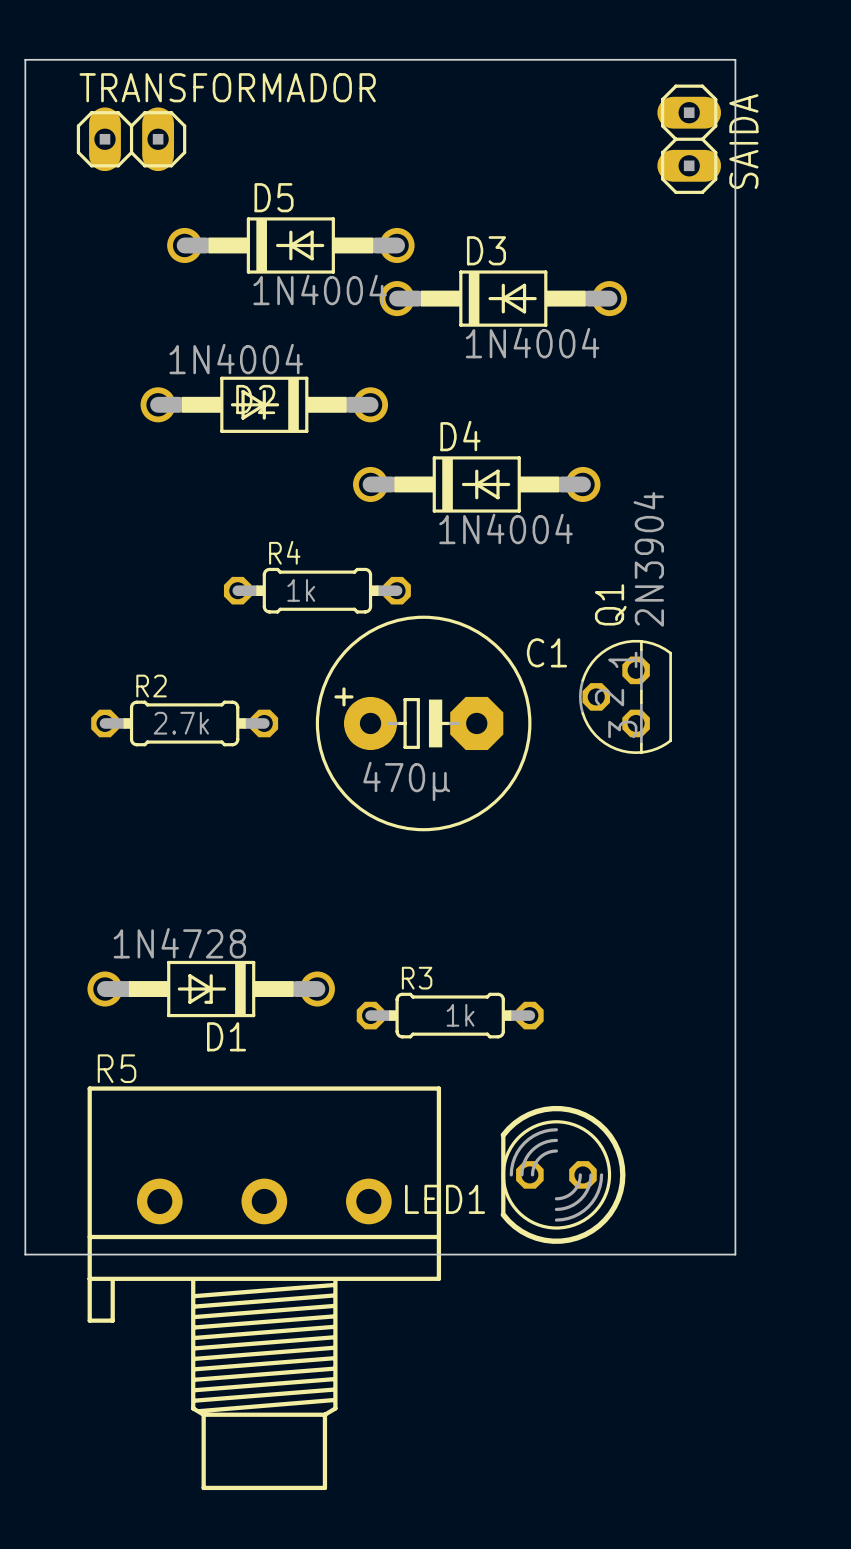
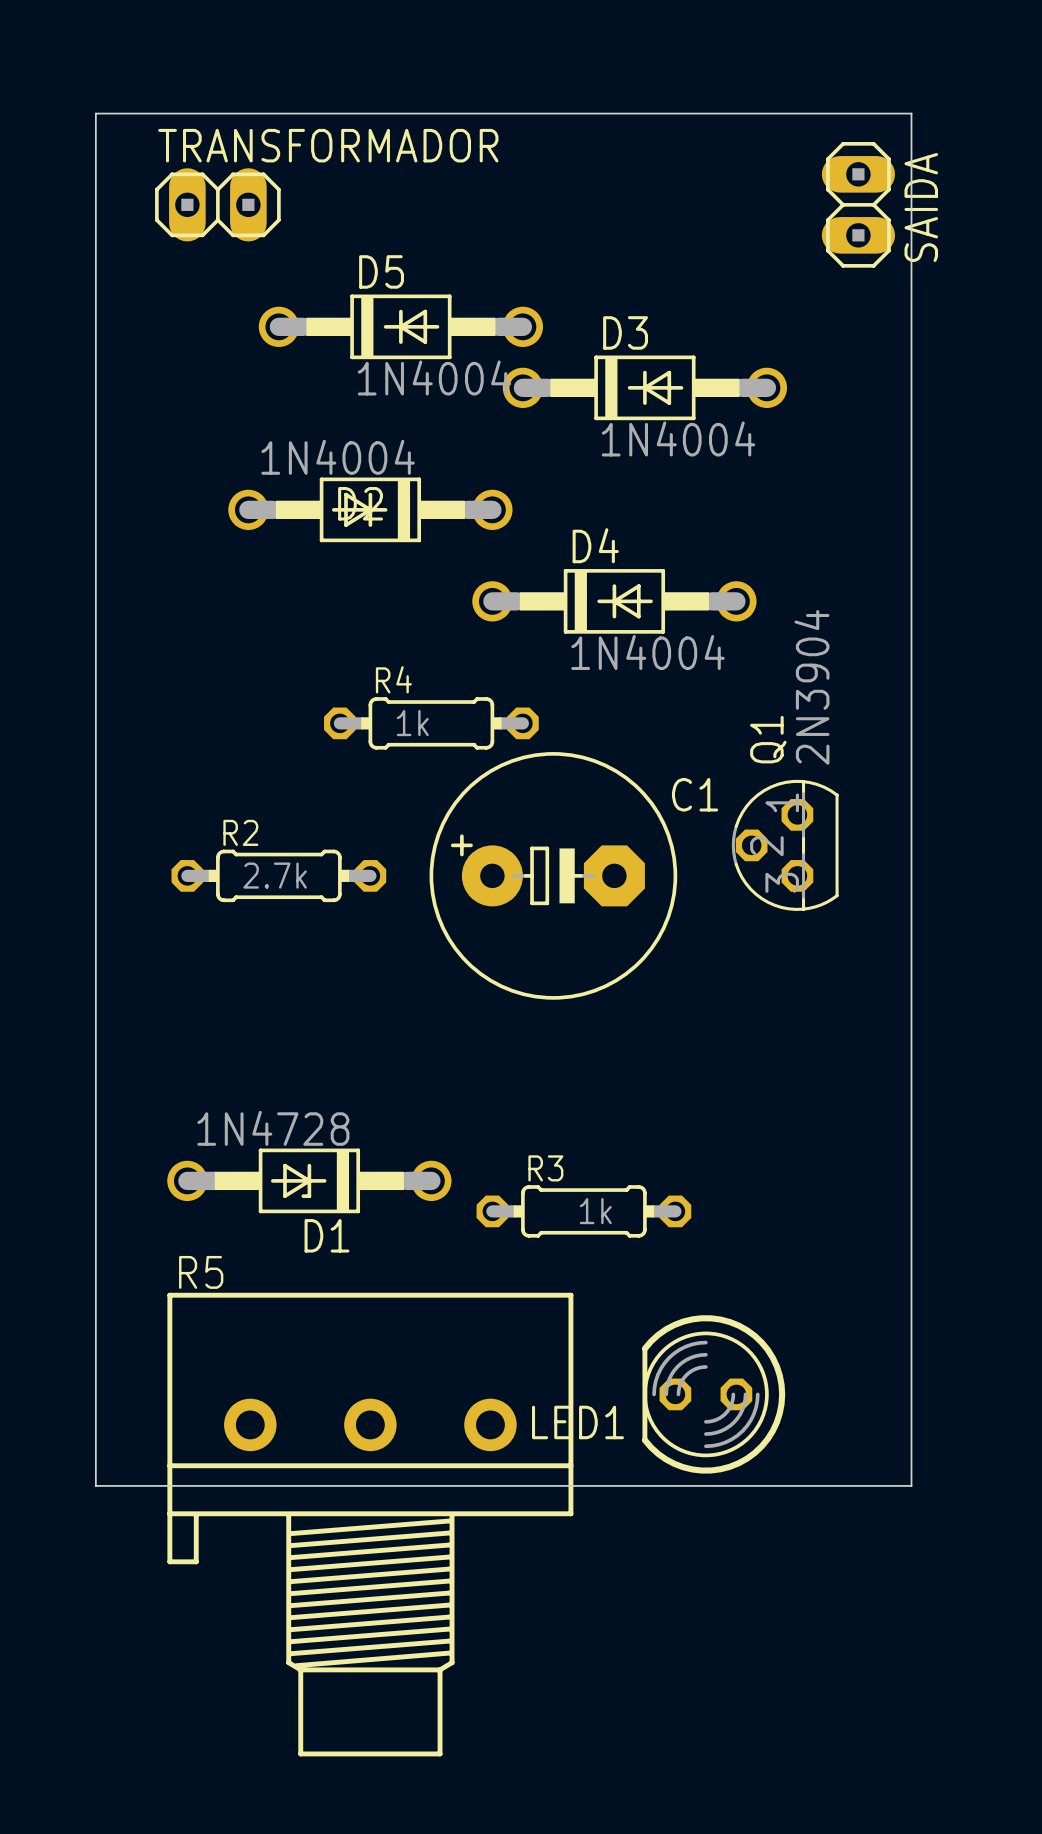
C1 value: 470μ (406, 781) -> none

